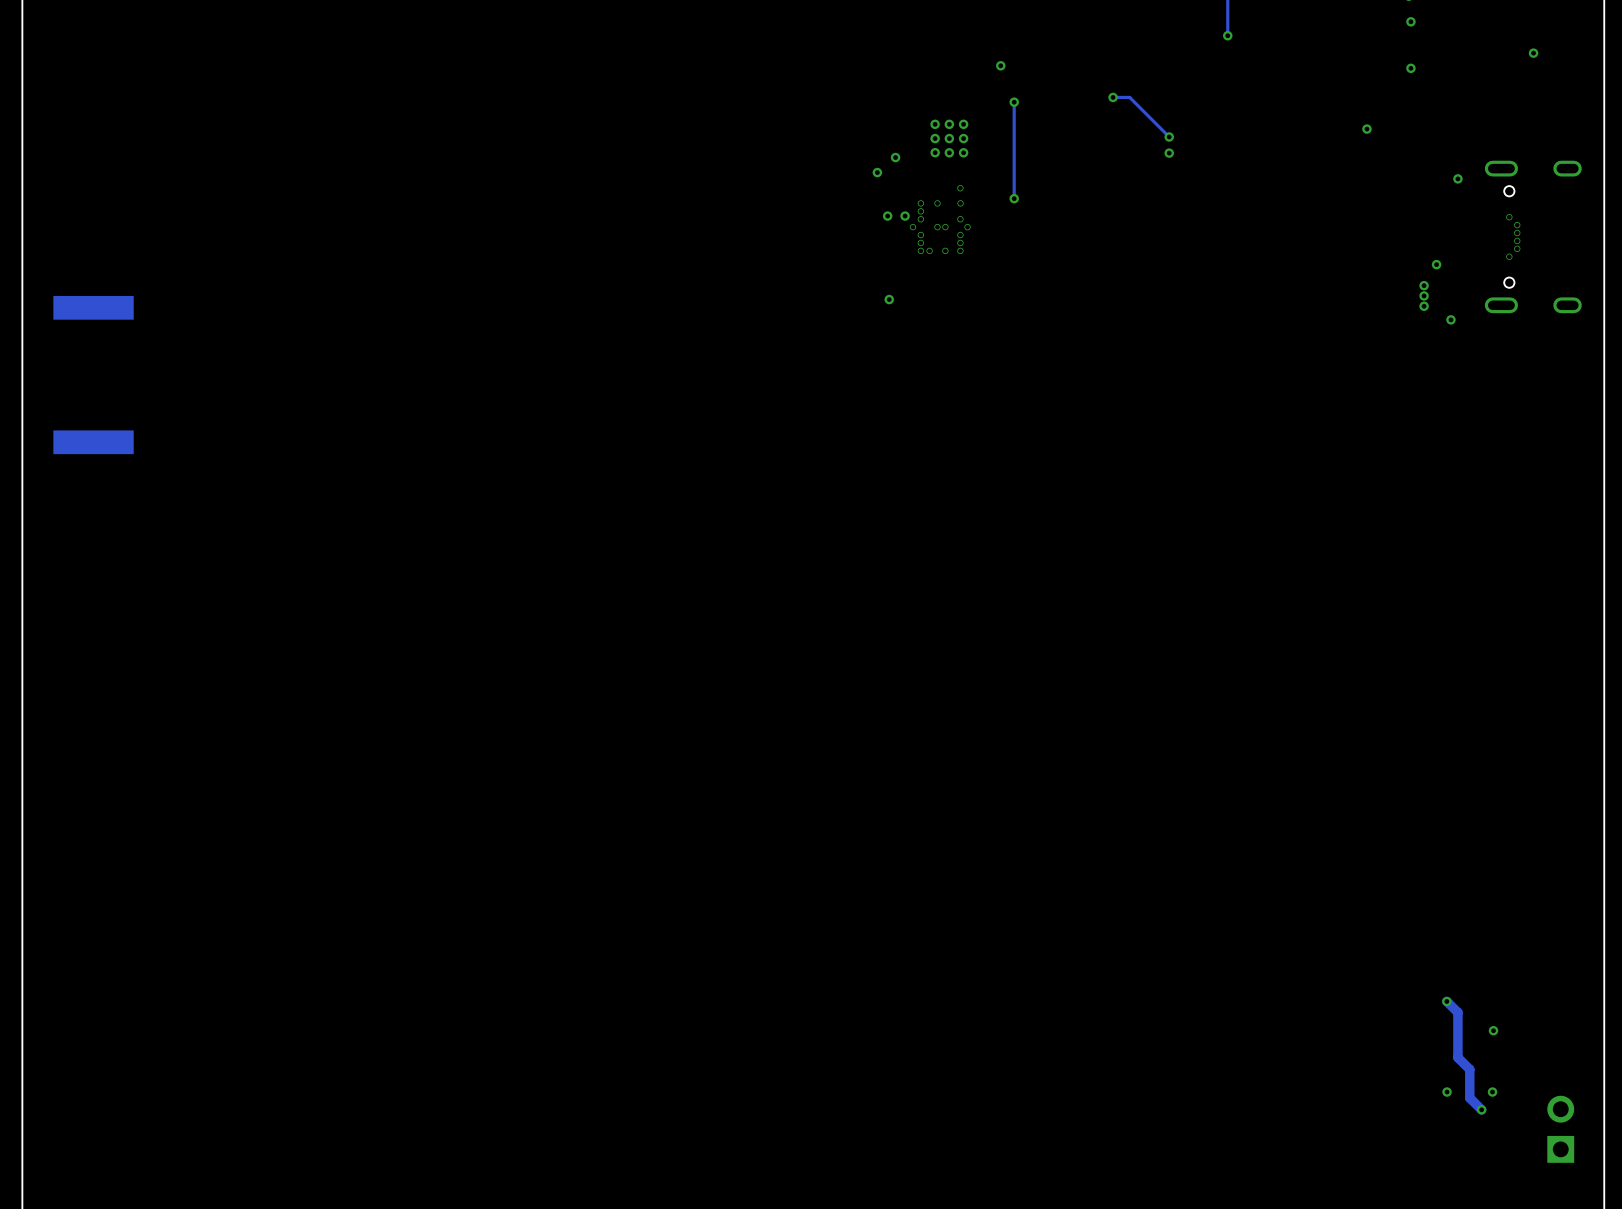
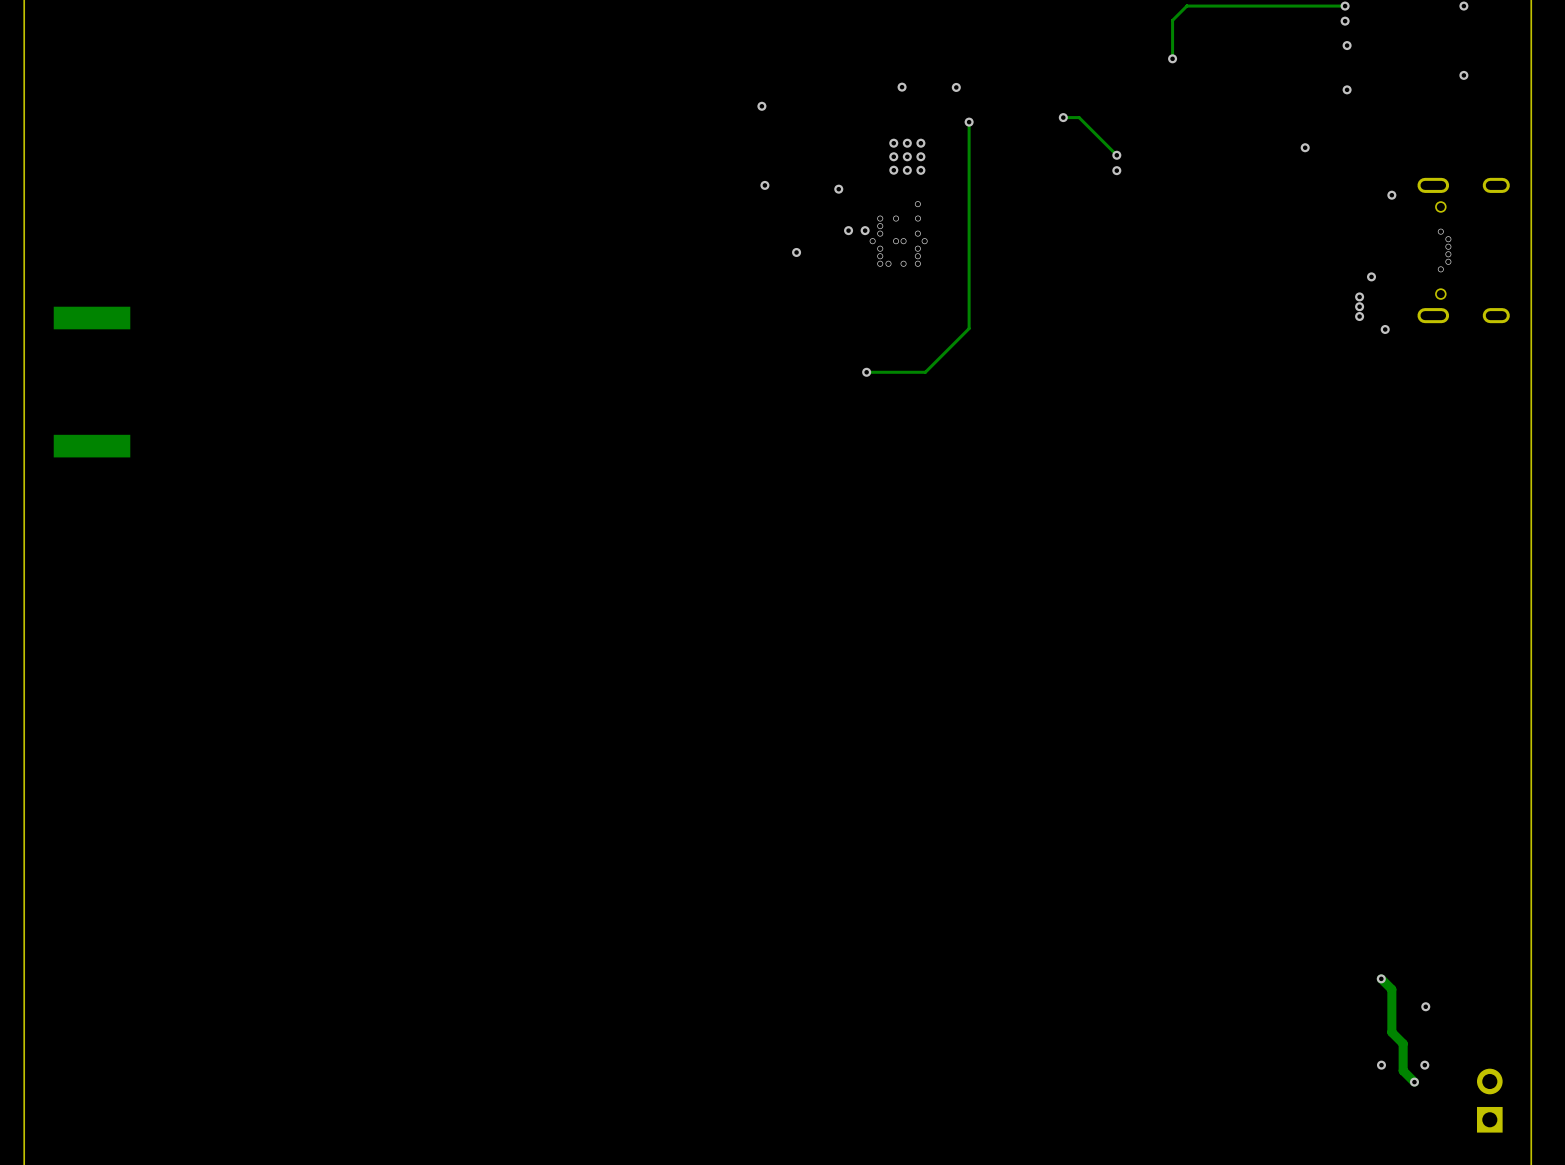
via: none -> (902, 87)
via: none -> (761, 106)
via: (895, 157) -> none
via: none -> (764, 185)
track: none -> (969, 214) (969, 328) (925, 372) (866, 372)
via: (1014, 198) -> none
via: none -> (796, 252)
via: (889, 299) -> none
via: none -> (866, 372)

